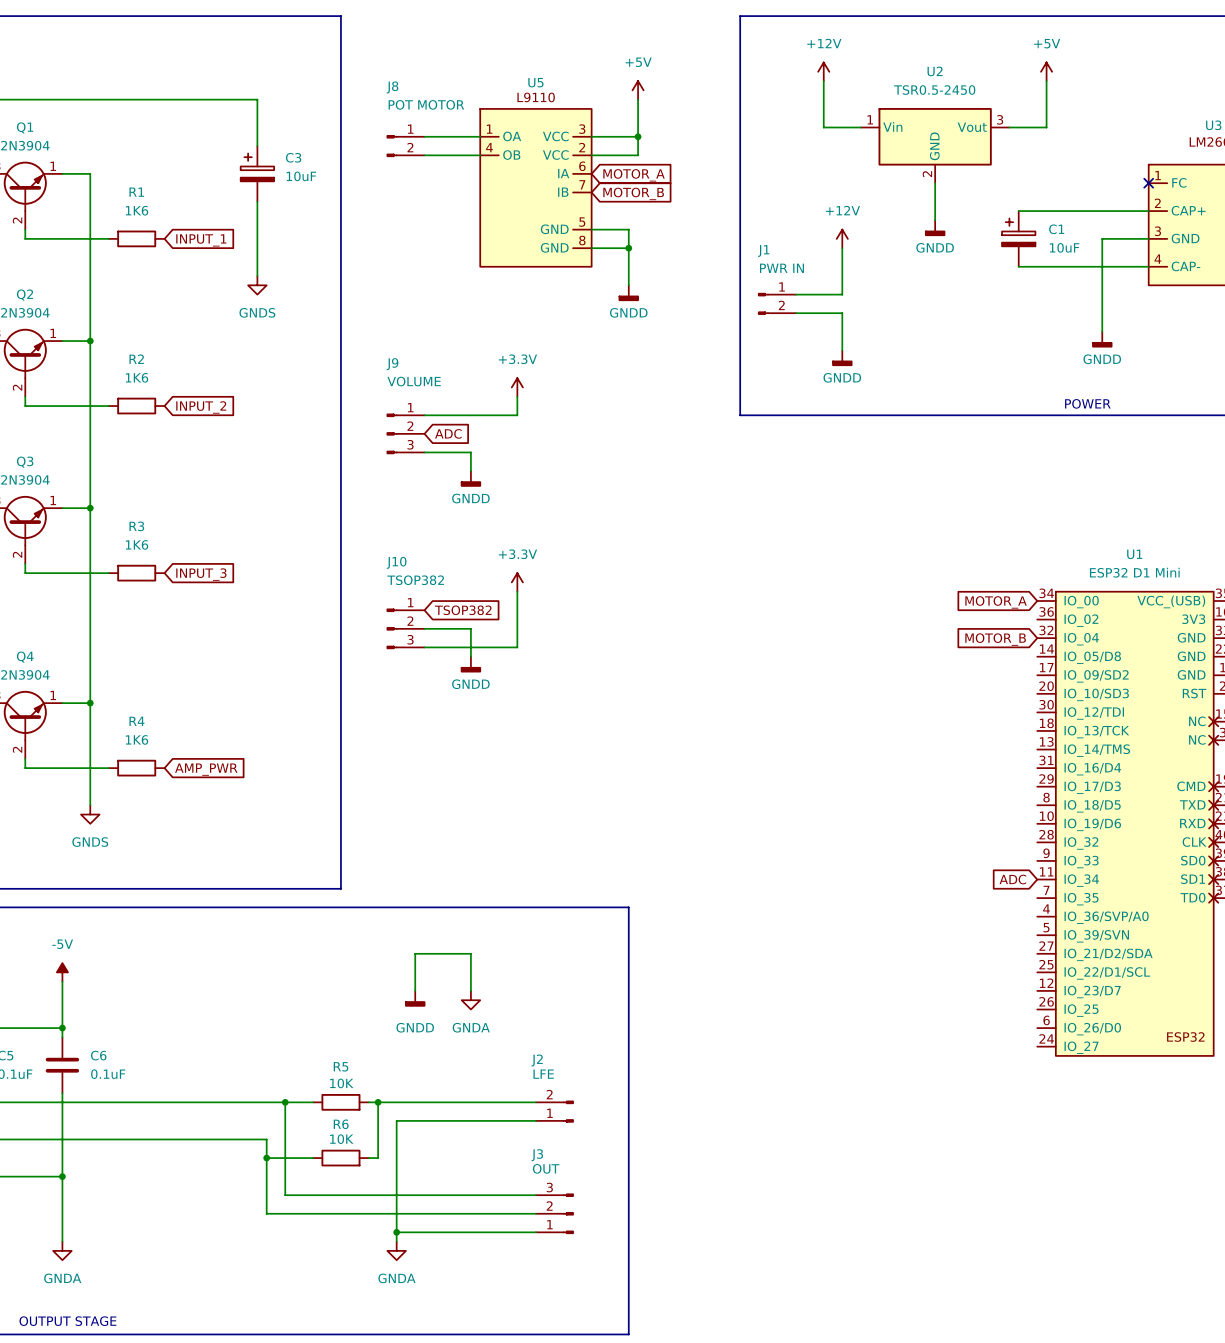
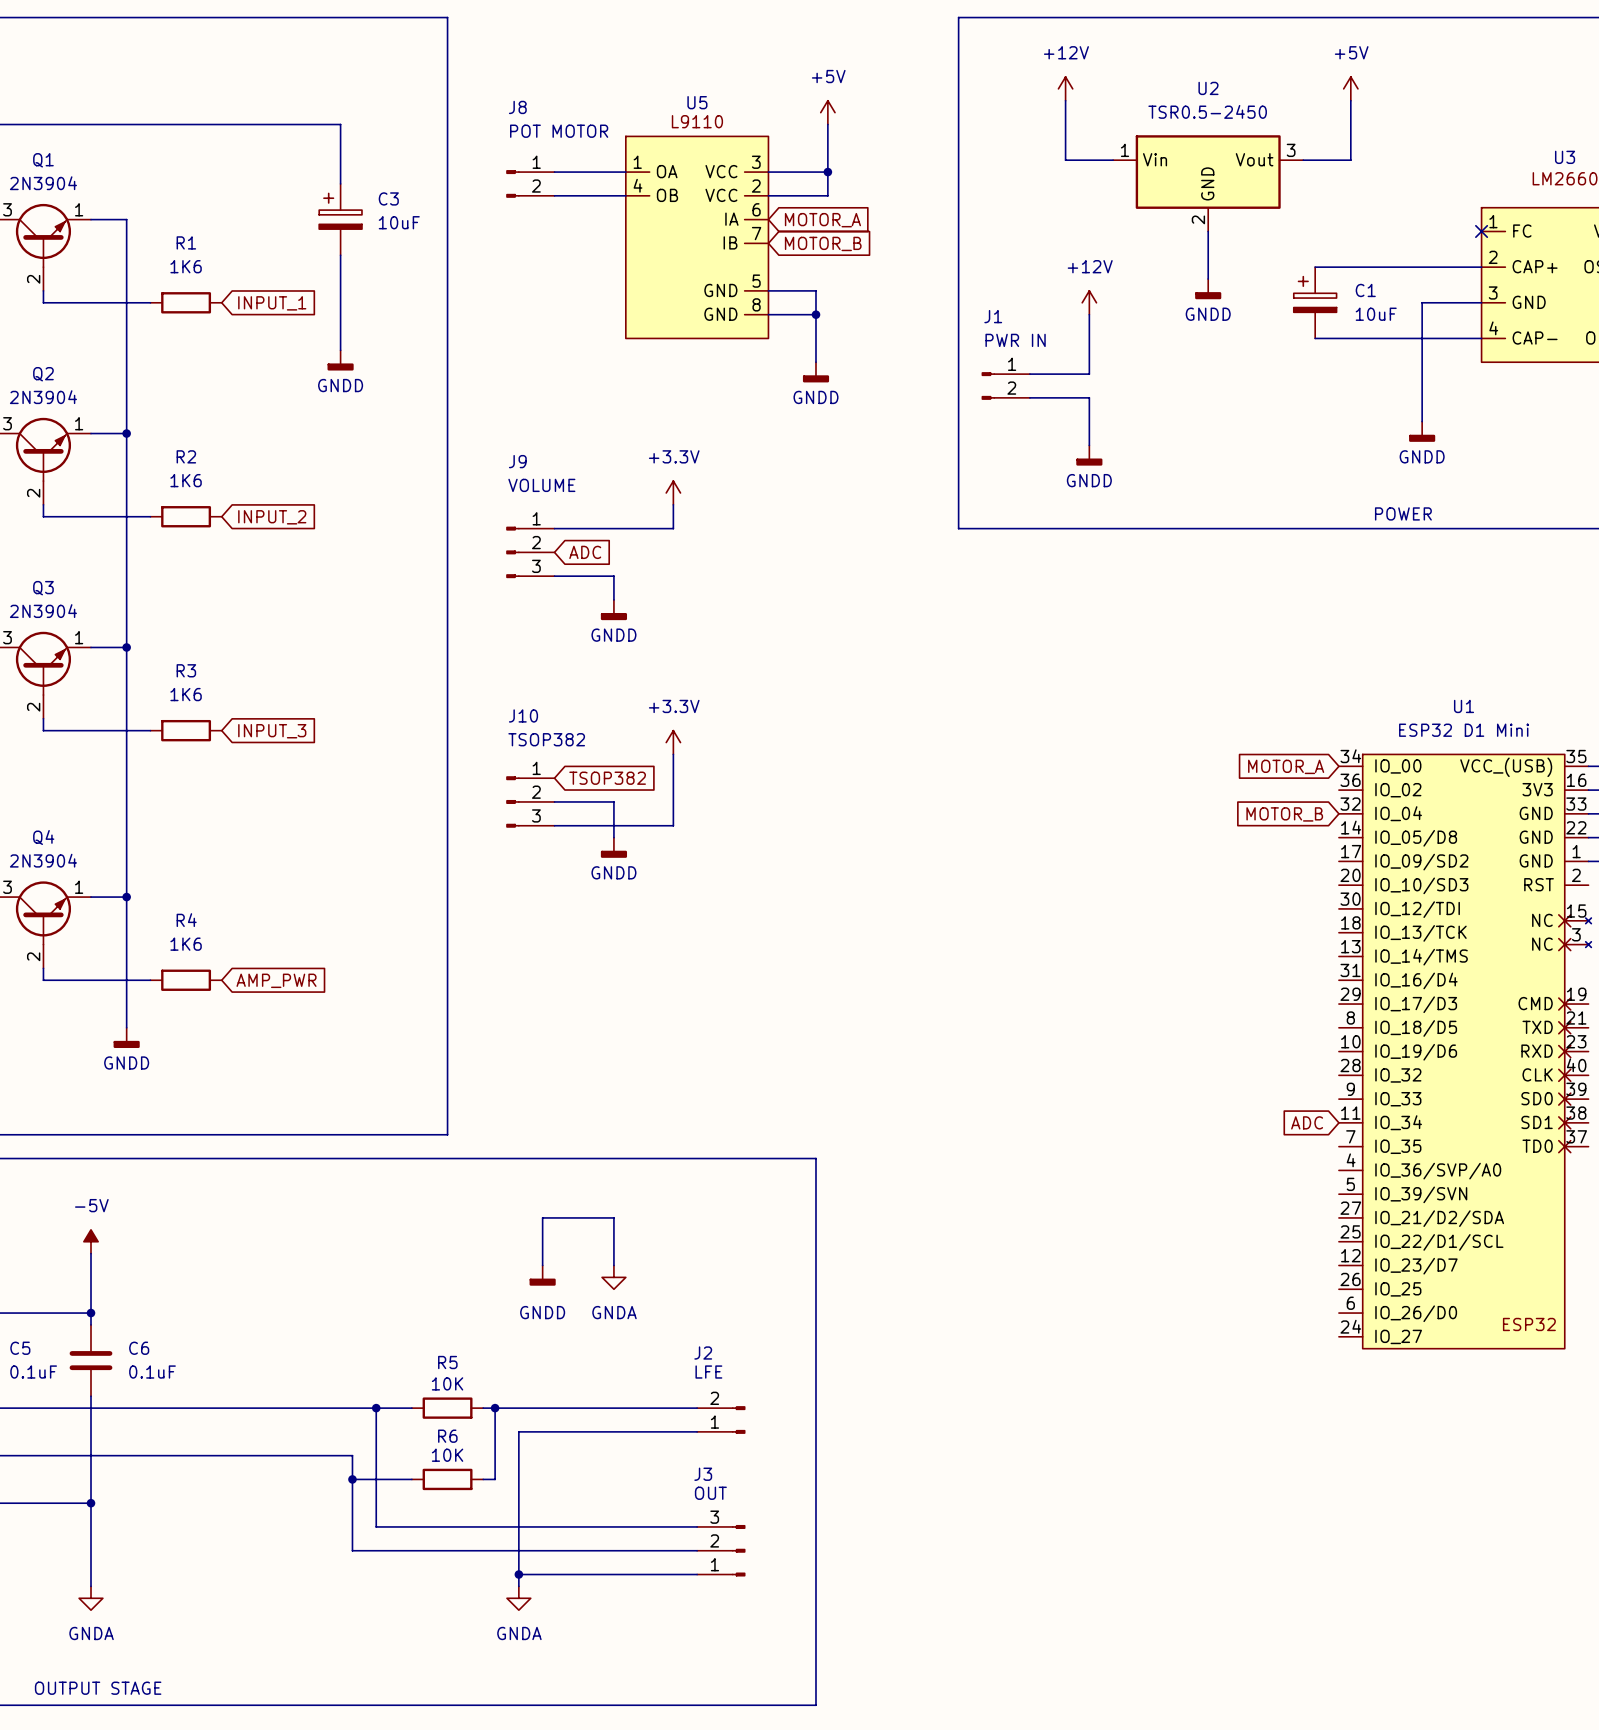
power symbol: GNDS (257, 285) -> GNDD (340, 360)
power symbol: GNDS (90, 814) -> GNDD (126, 1037)

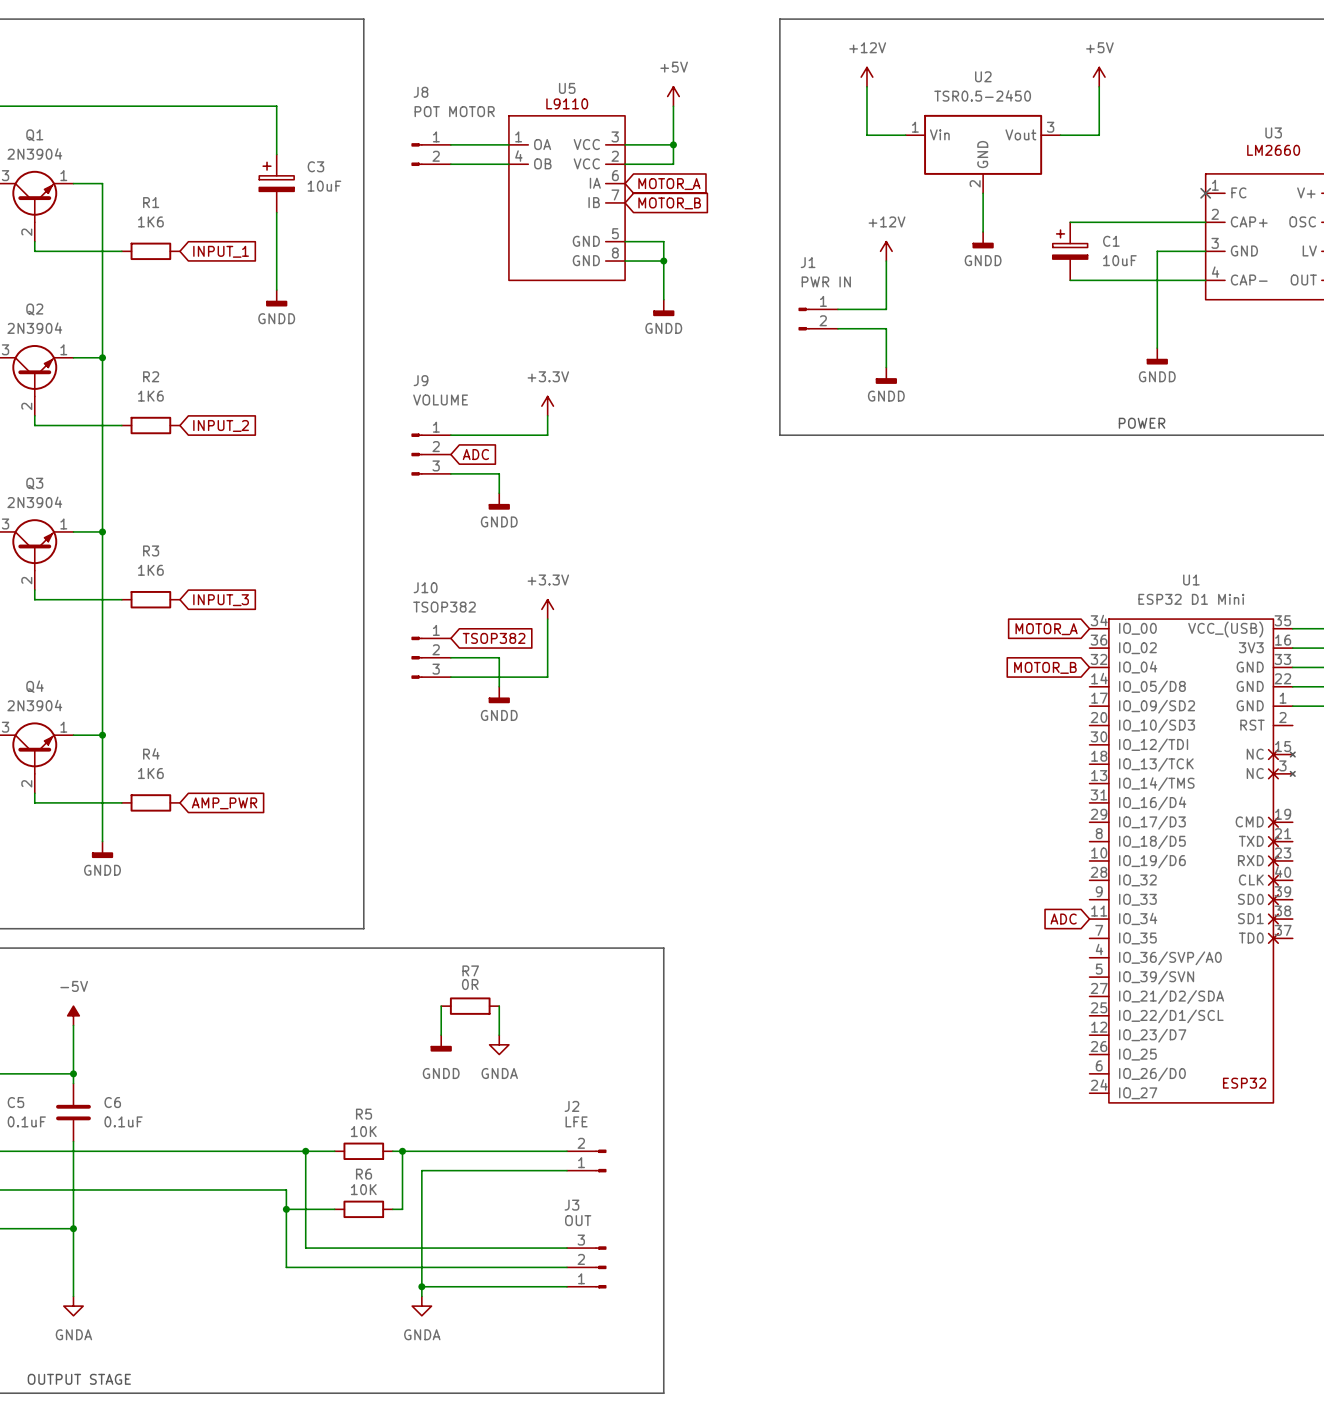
wire: (542, 1229) (542, 1217) (613, 1217) (613, 1229) -> none
R7: none -> 0R (470, 1006)

